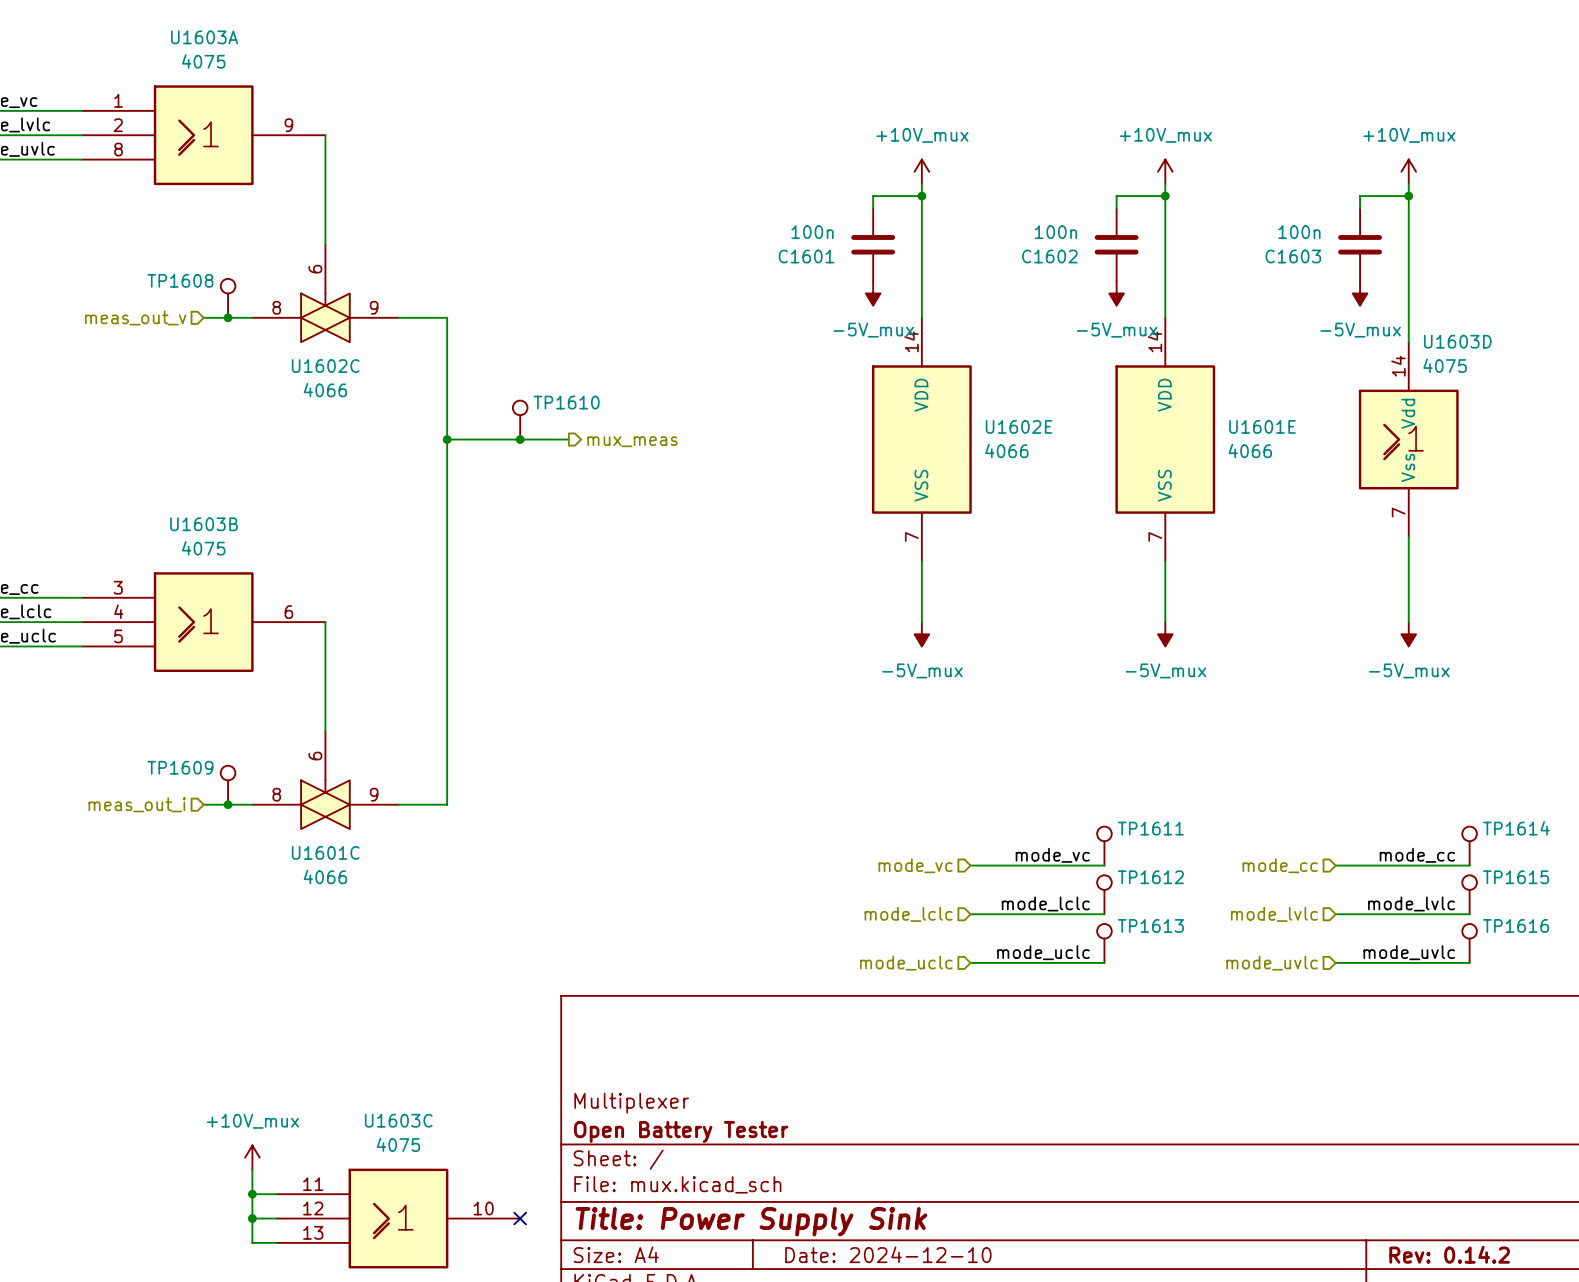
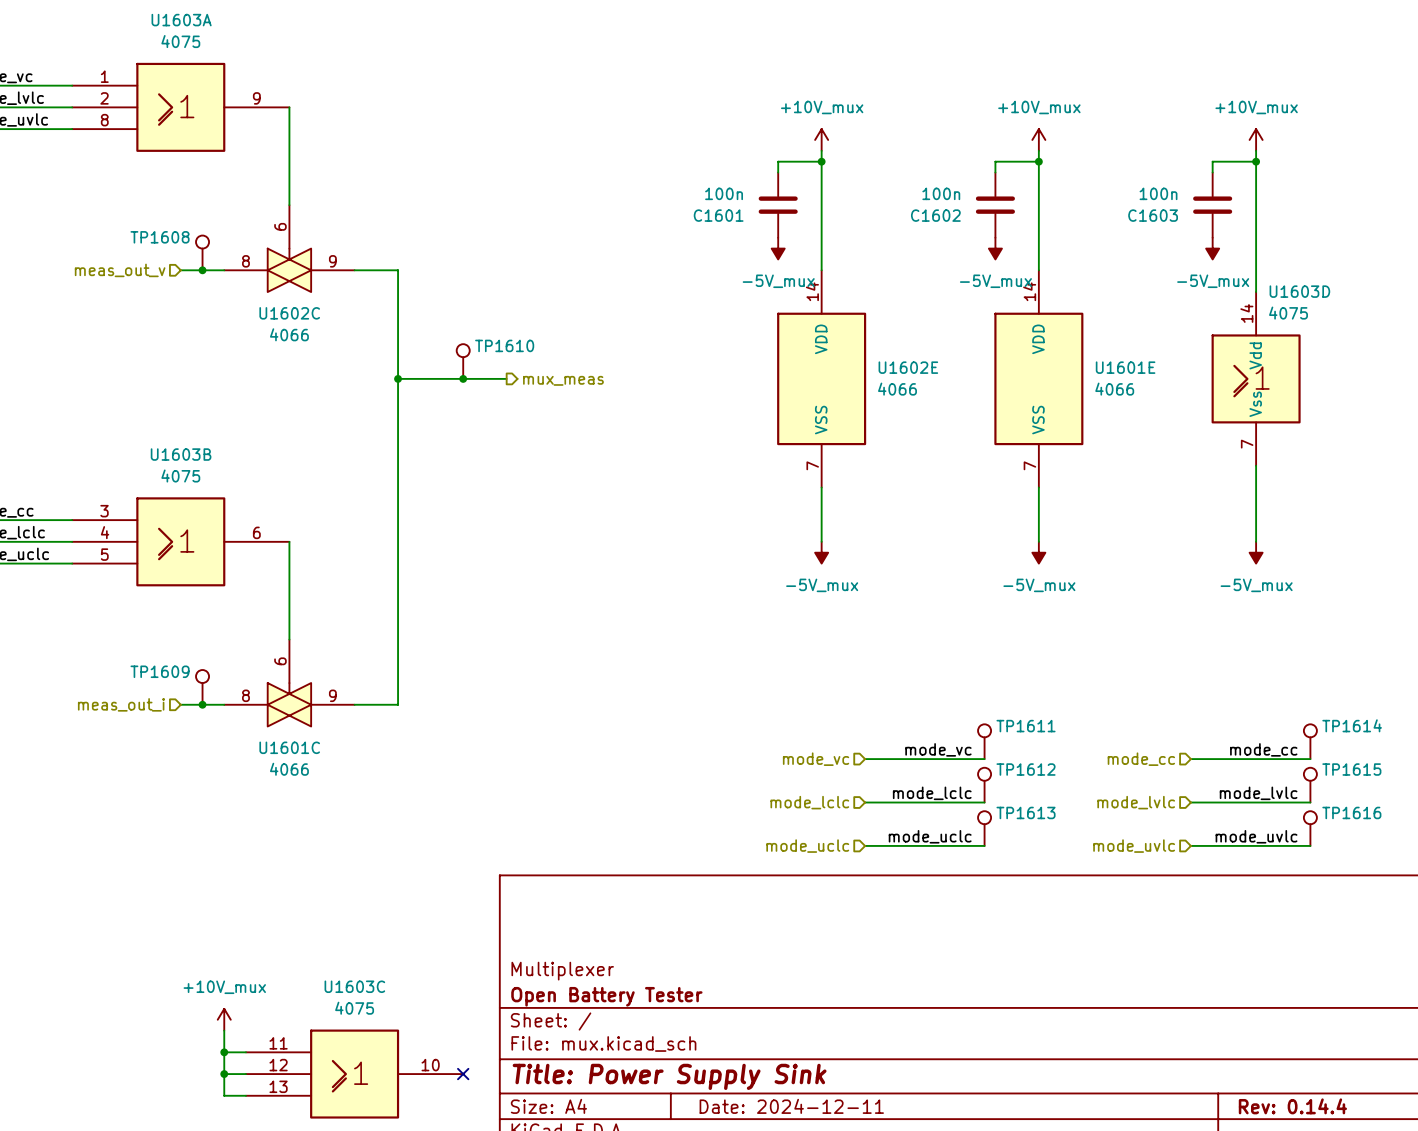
title block: Date: 2024-12-10 (888, 1254) -> Date: 2024-12-11 (791, 1106)
title block: Rev: 0.14.2 (1449, 1254) -> Rev: 0.14.4 (1292, 1106)

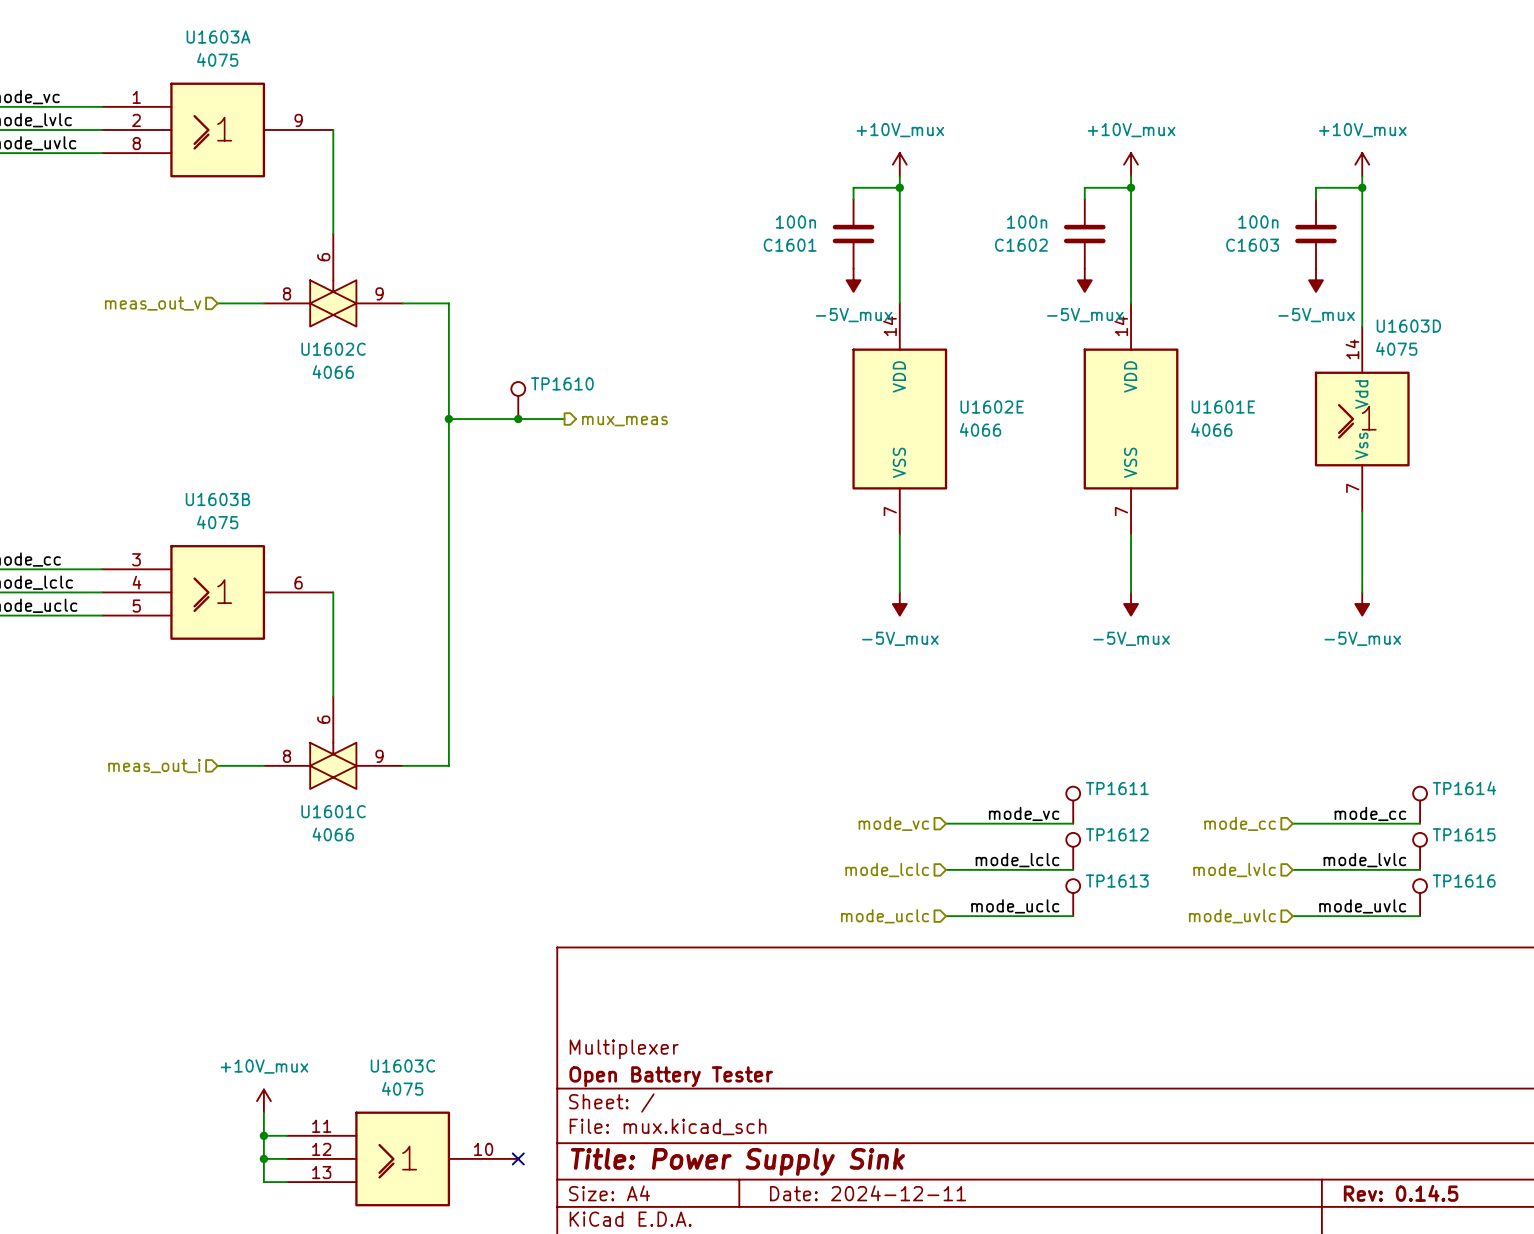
TP1608: (202, 252) -> none
junction: (202, 270) -> none
TP1609: (202, 687) -> none
junction: (202, 704) -> none
title block: Rev: 0.14.4 (1292, 1106) -> Rev: 0.14.5 (1401, 1193)

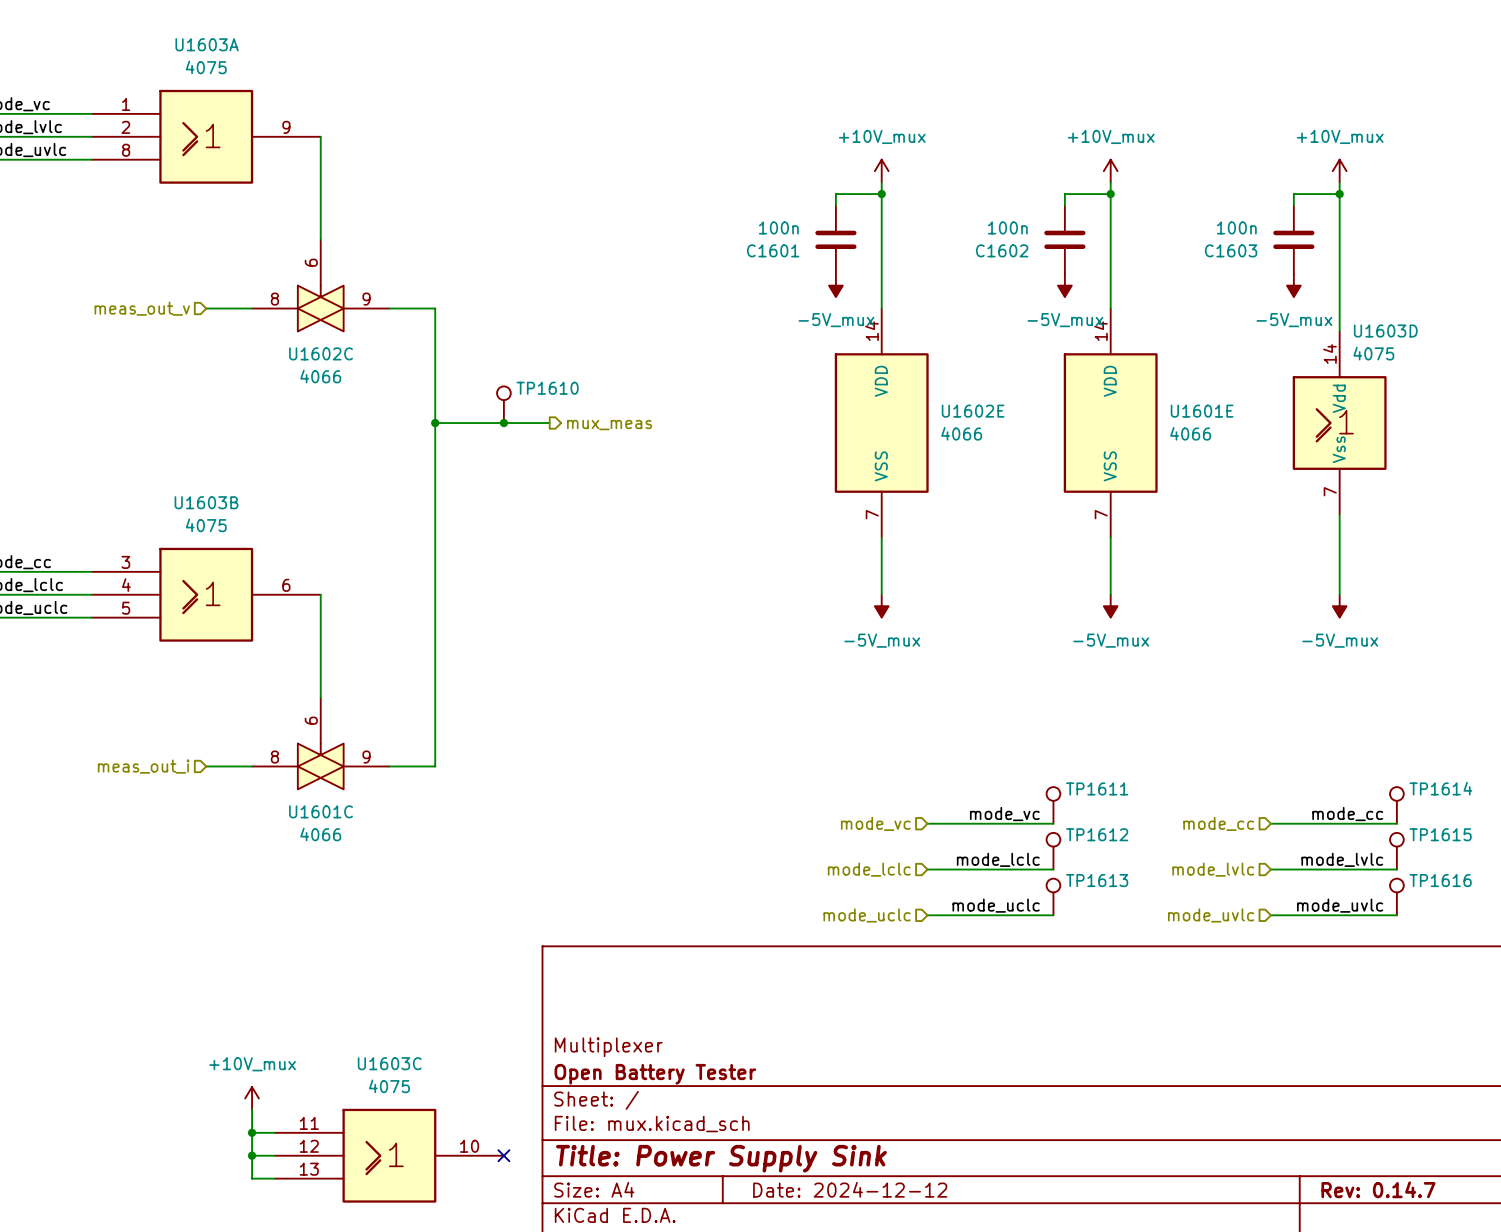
title block: Date: 2024-12-11 (867, 1193) -> Date: 2024-12-12 (850, 1189)
title block: Rev: 0.14.5 (1401, 1193) -> Rev: 0.14.7 (1378, 1189)

